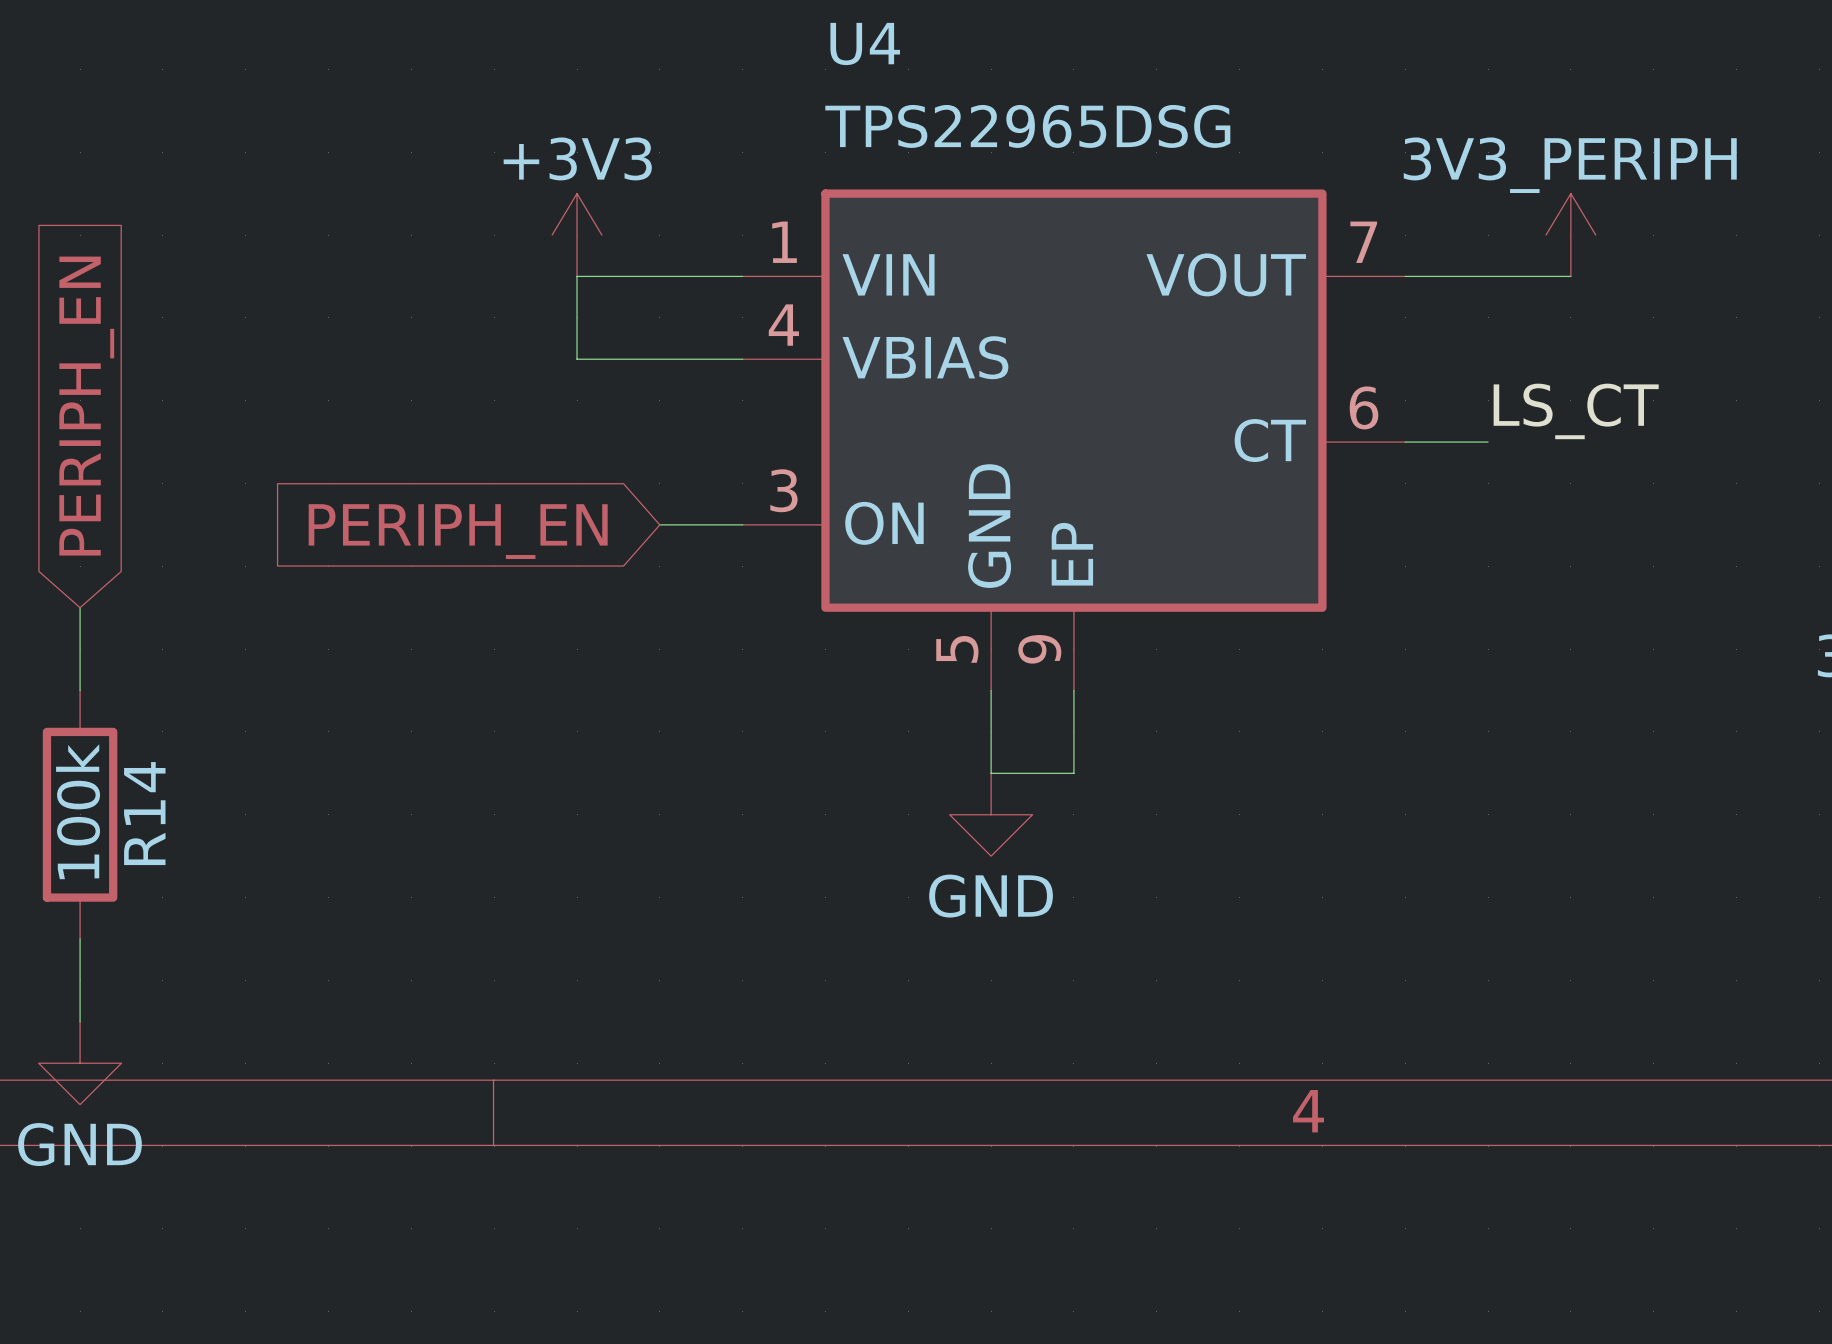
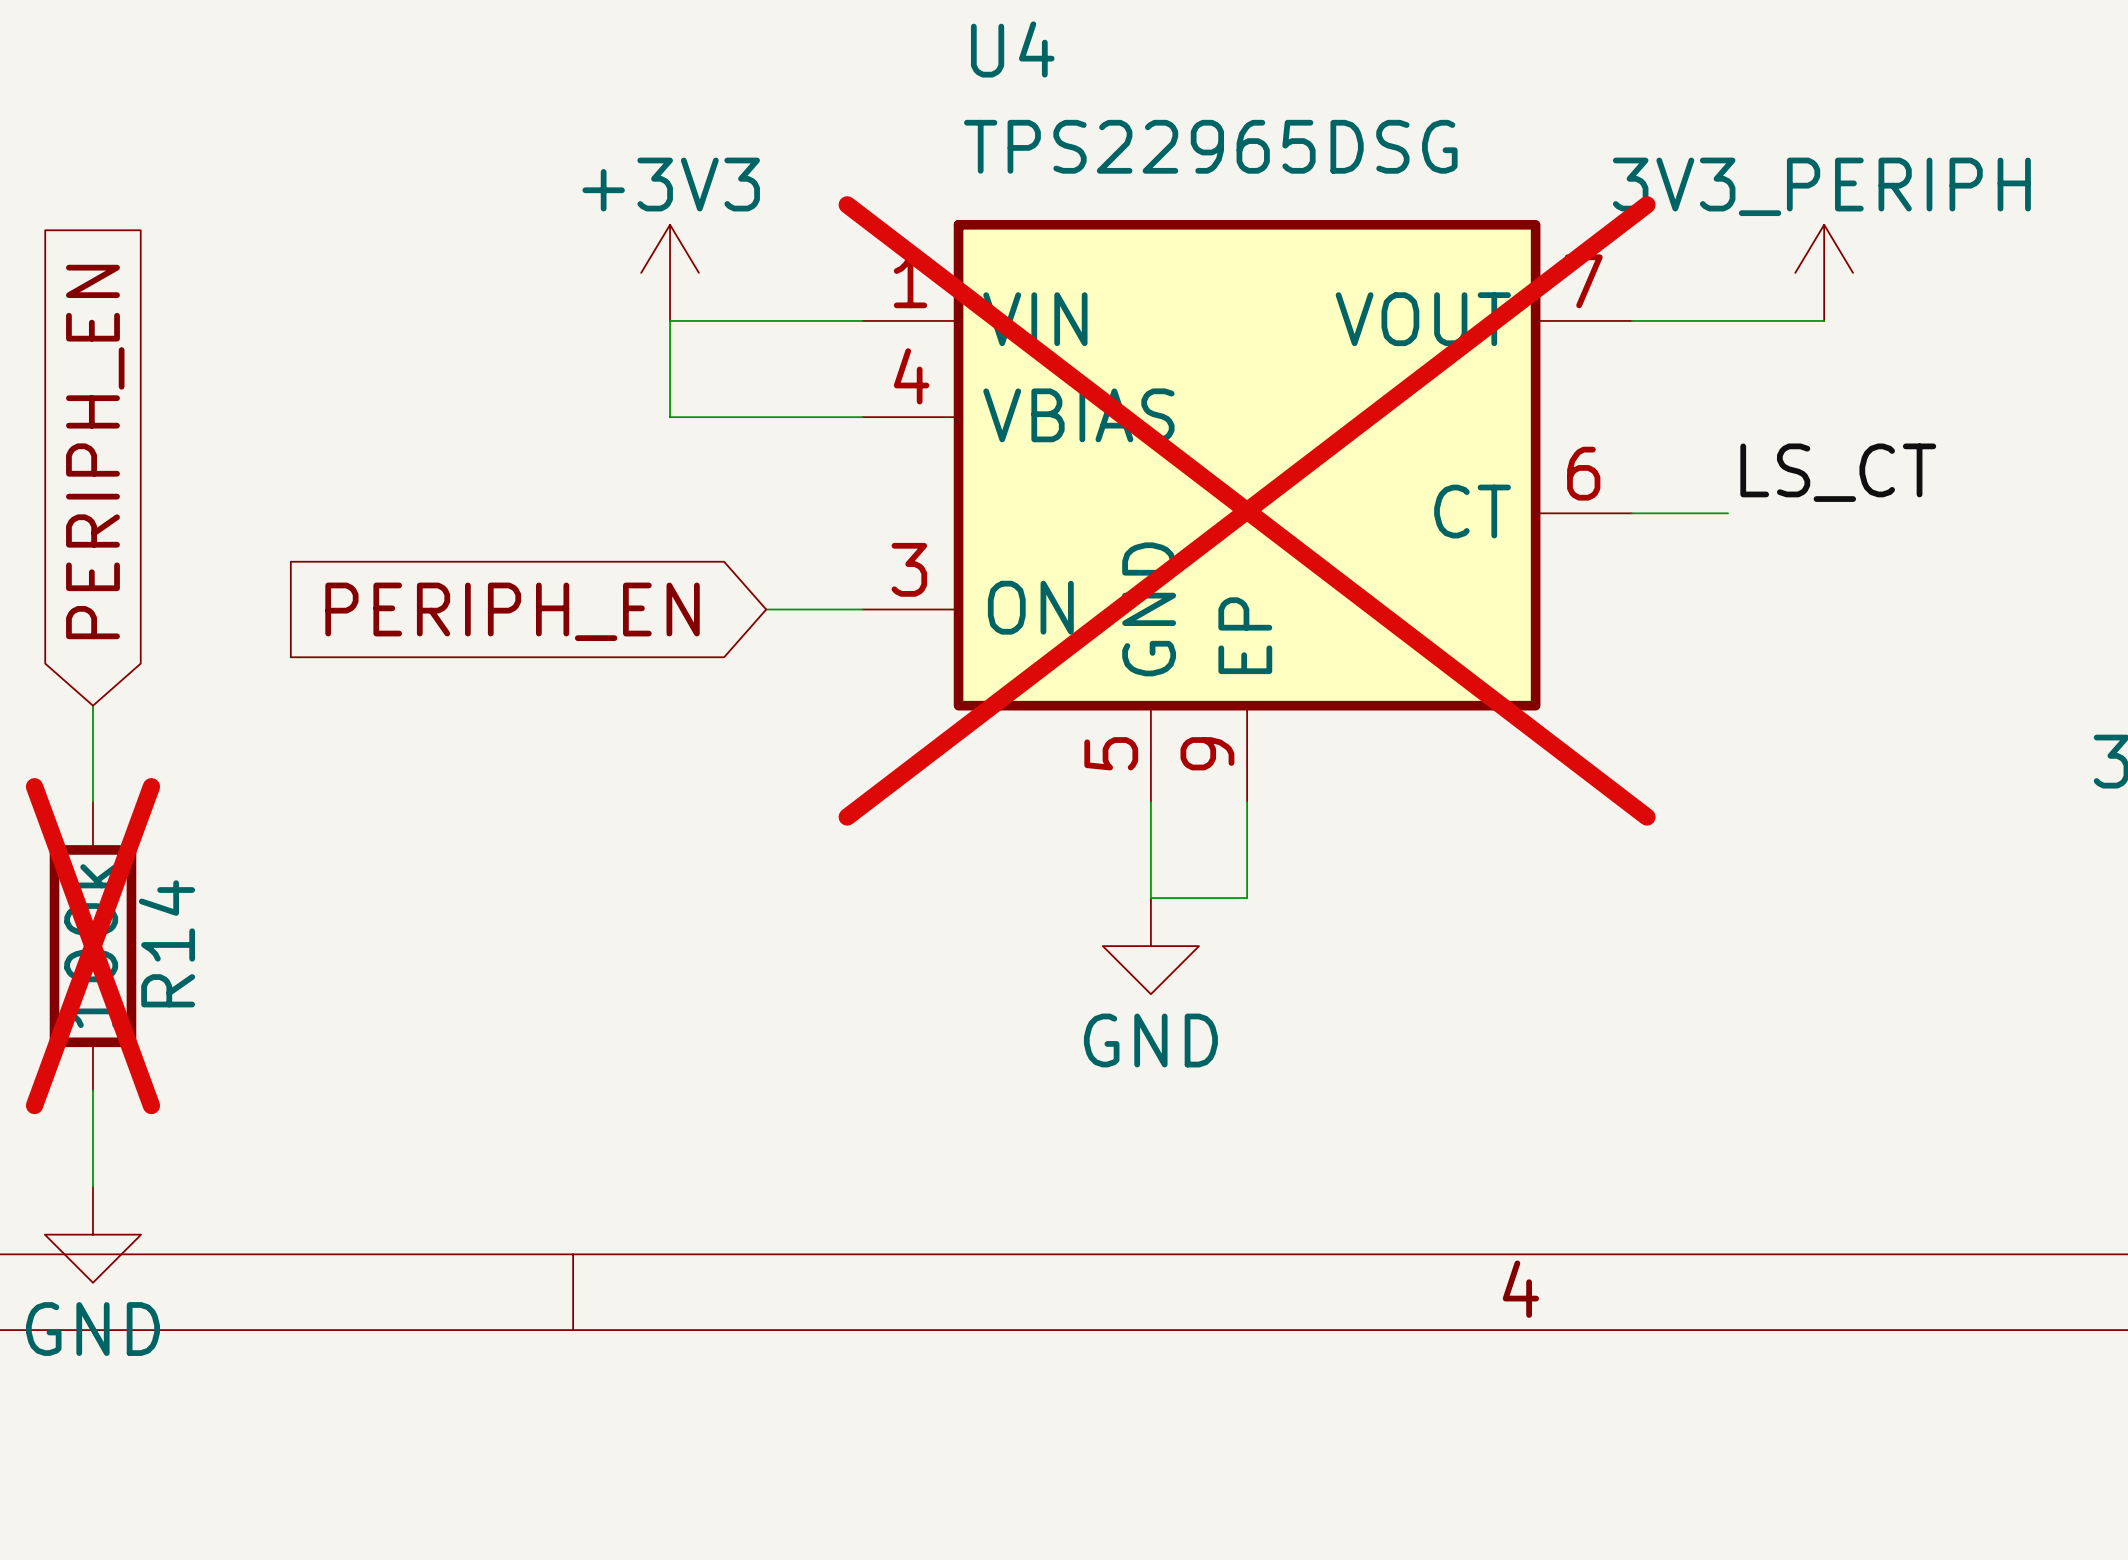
U4 do-not-place cross: none -> (1247, 510)
R14 do-not-place cross: none -> (92, 946)

